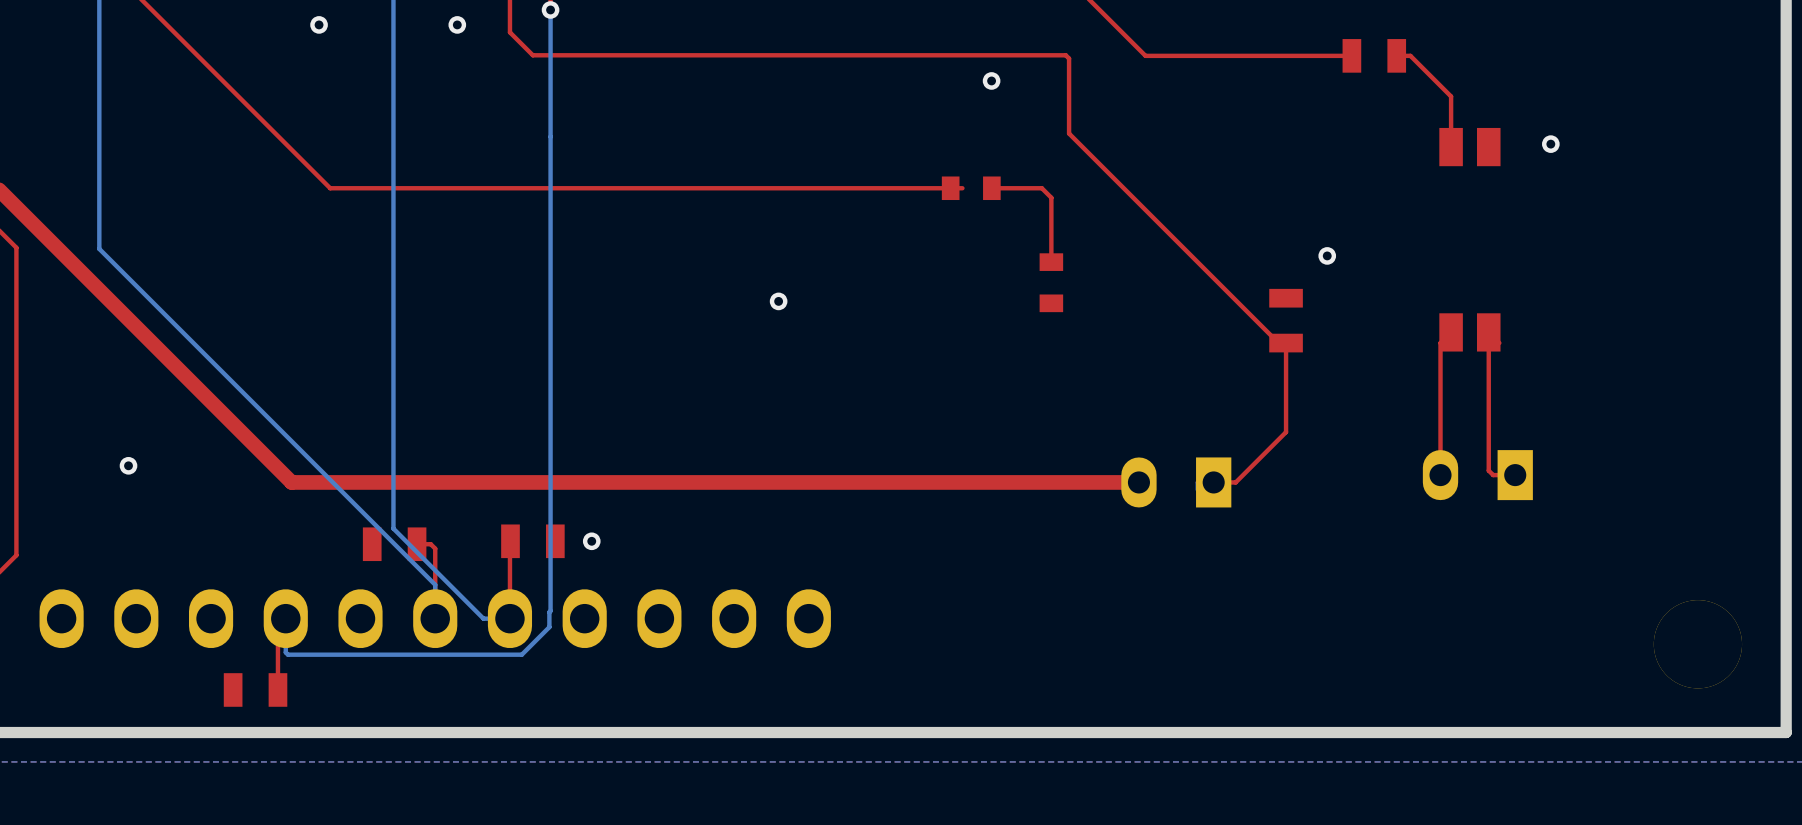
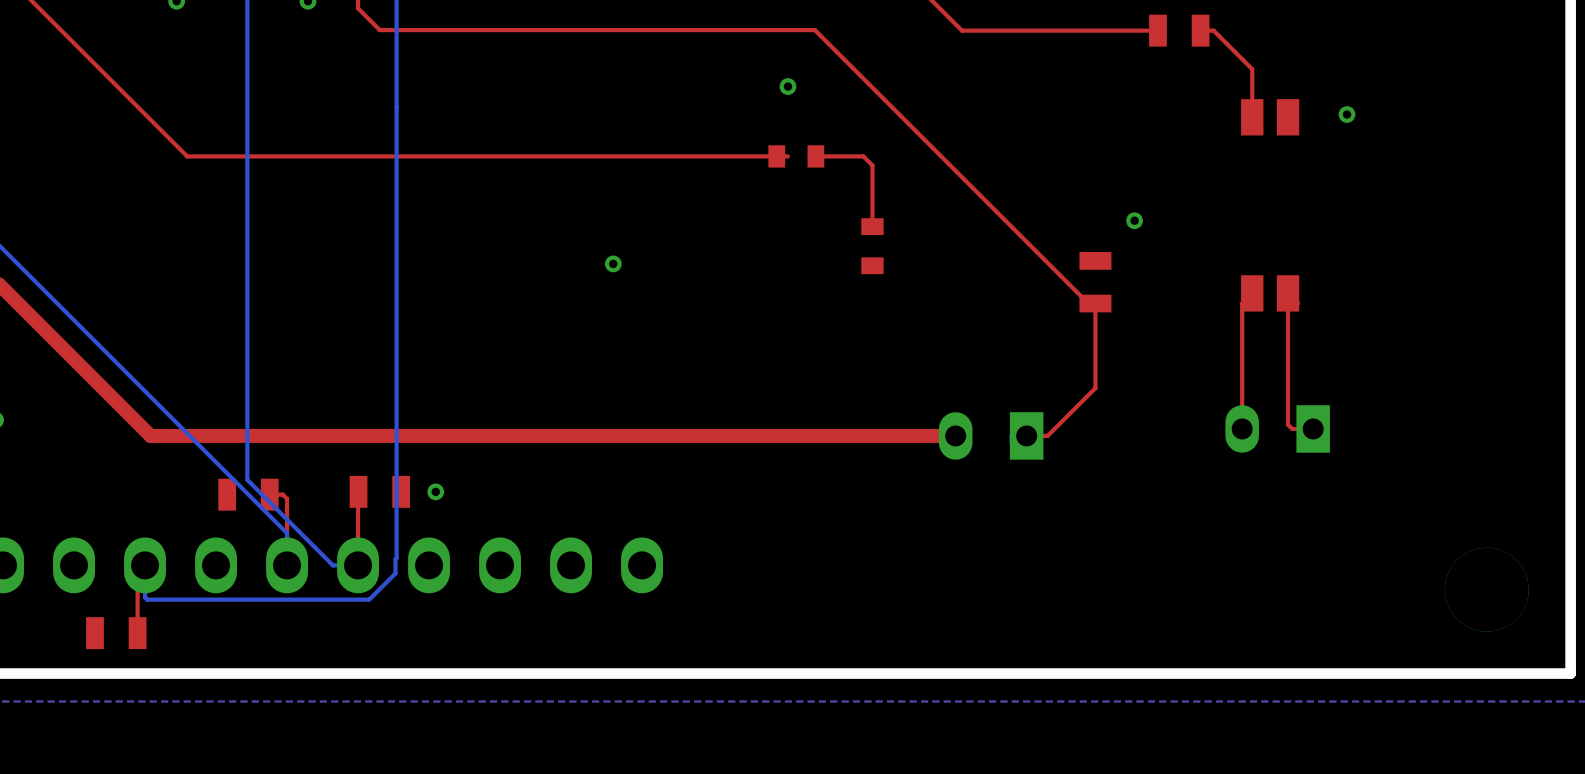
top track: (990, 55) (1065, 55) (1069, 58) (1069, 133) -> (814, 30) (889, 104)
via position: (991, 80) -> (787, 86)

